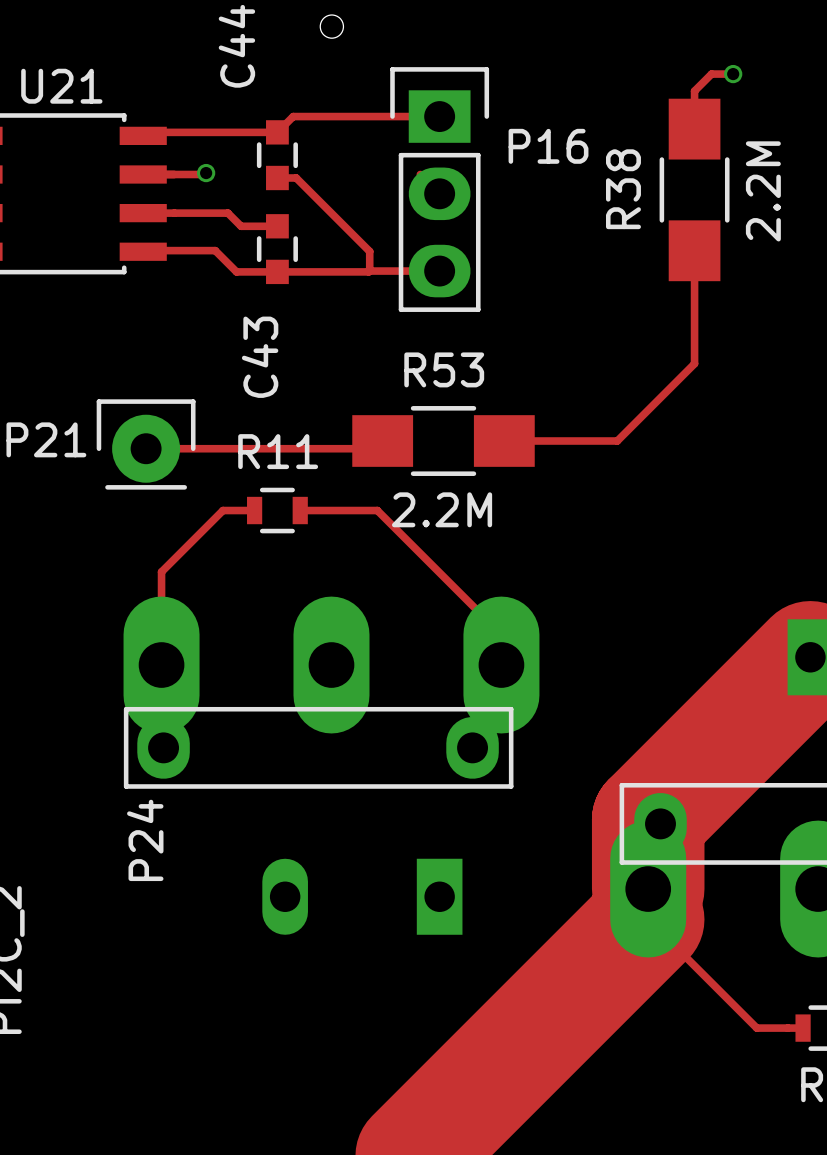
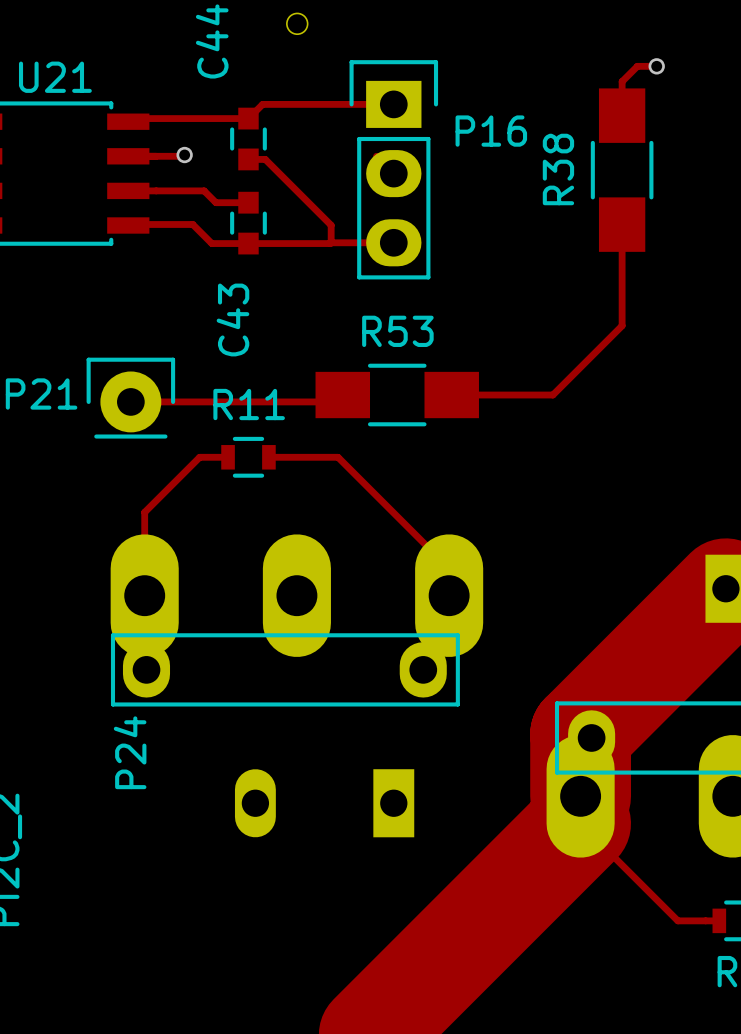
R38 value: 2.2M (763, 191) -> none
R53 value: 2.2M (442, 509) -> none

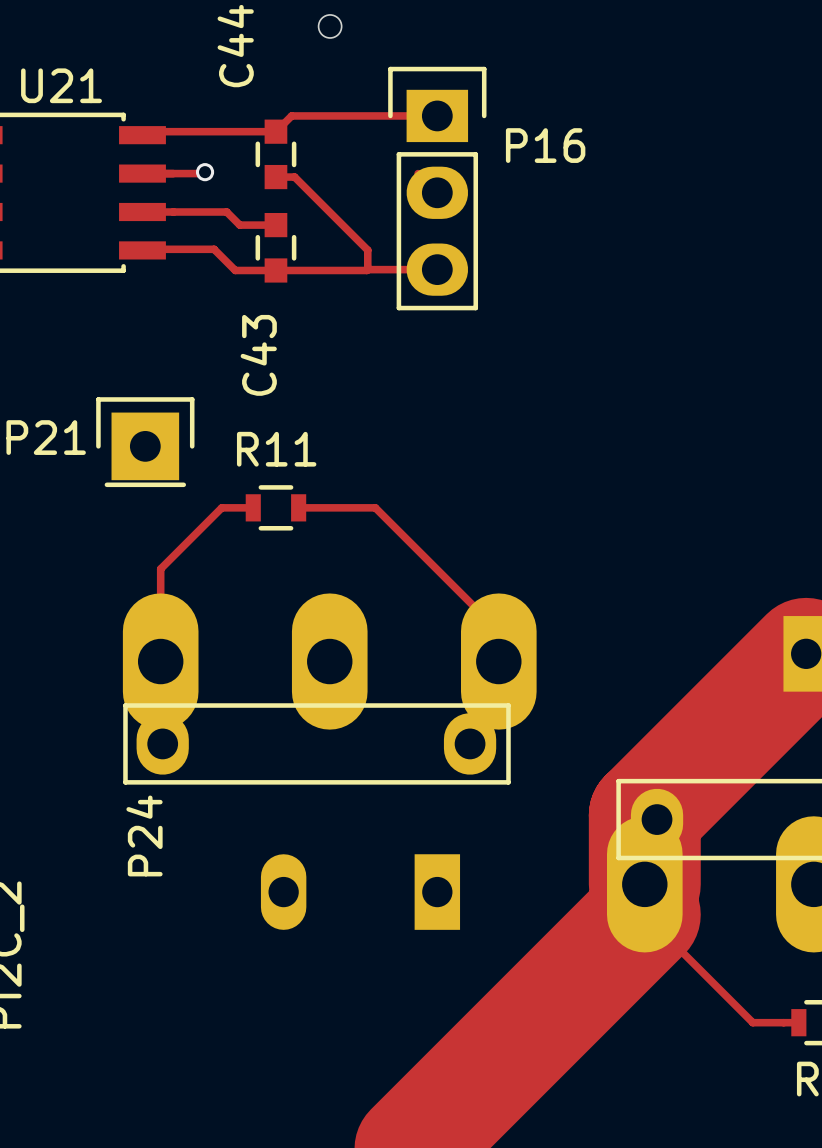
track: (656, 66) (637, 66) (622, 81) (622, 115) -> none
via: (656, 66) -> none
R38: (622, 170) -> none
track: (622, 224) (622, 325) (552, 395) (451, 395) -> none
P21 footprint: [86, 357, 176, 439] -> [96, 397, 195, 488]
track: (342, 395) (335, 401) (130, 401) -> none
R53: (397, 395) -> none

